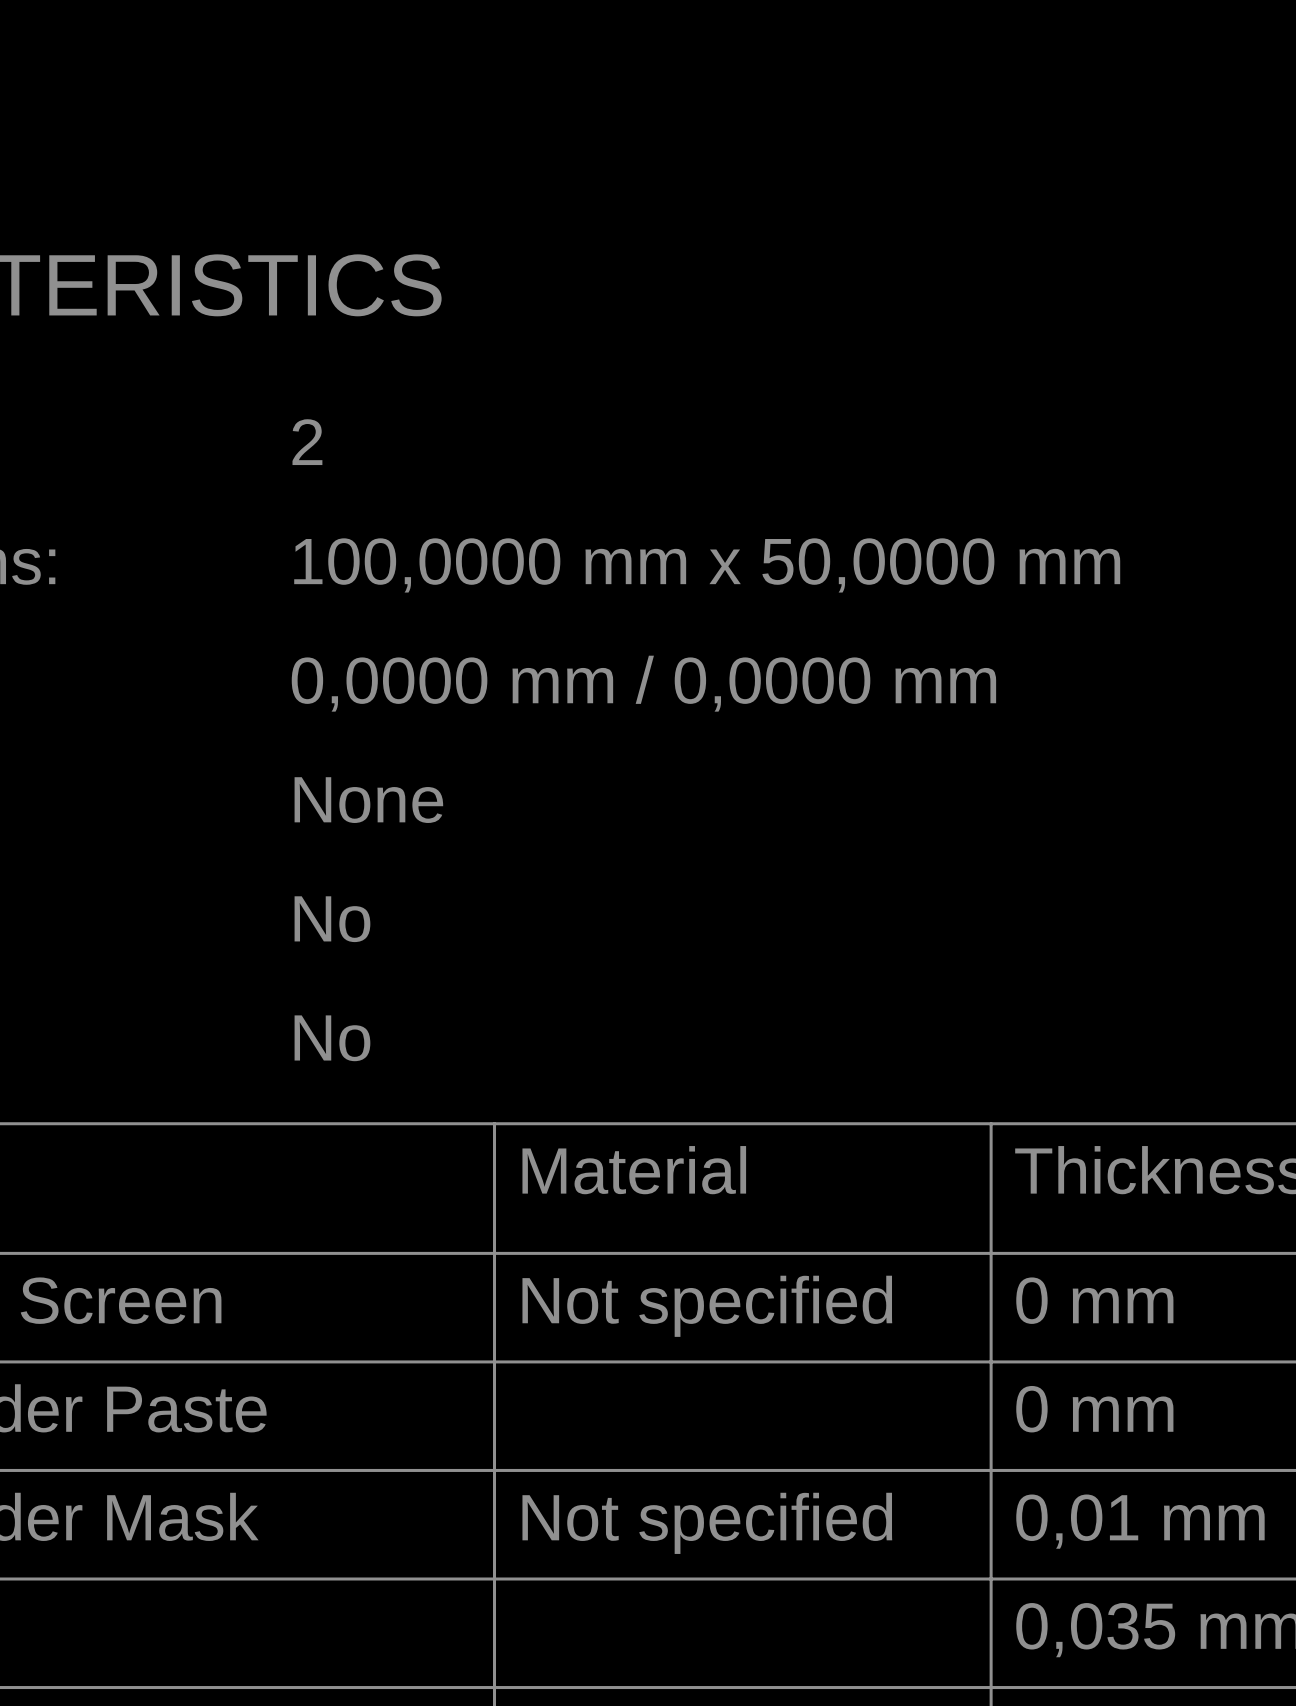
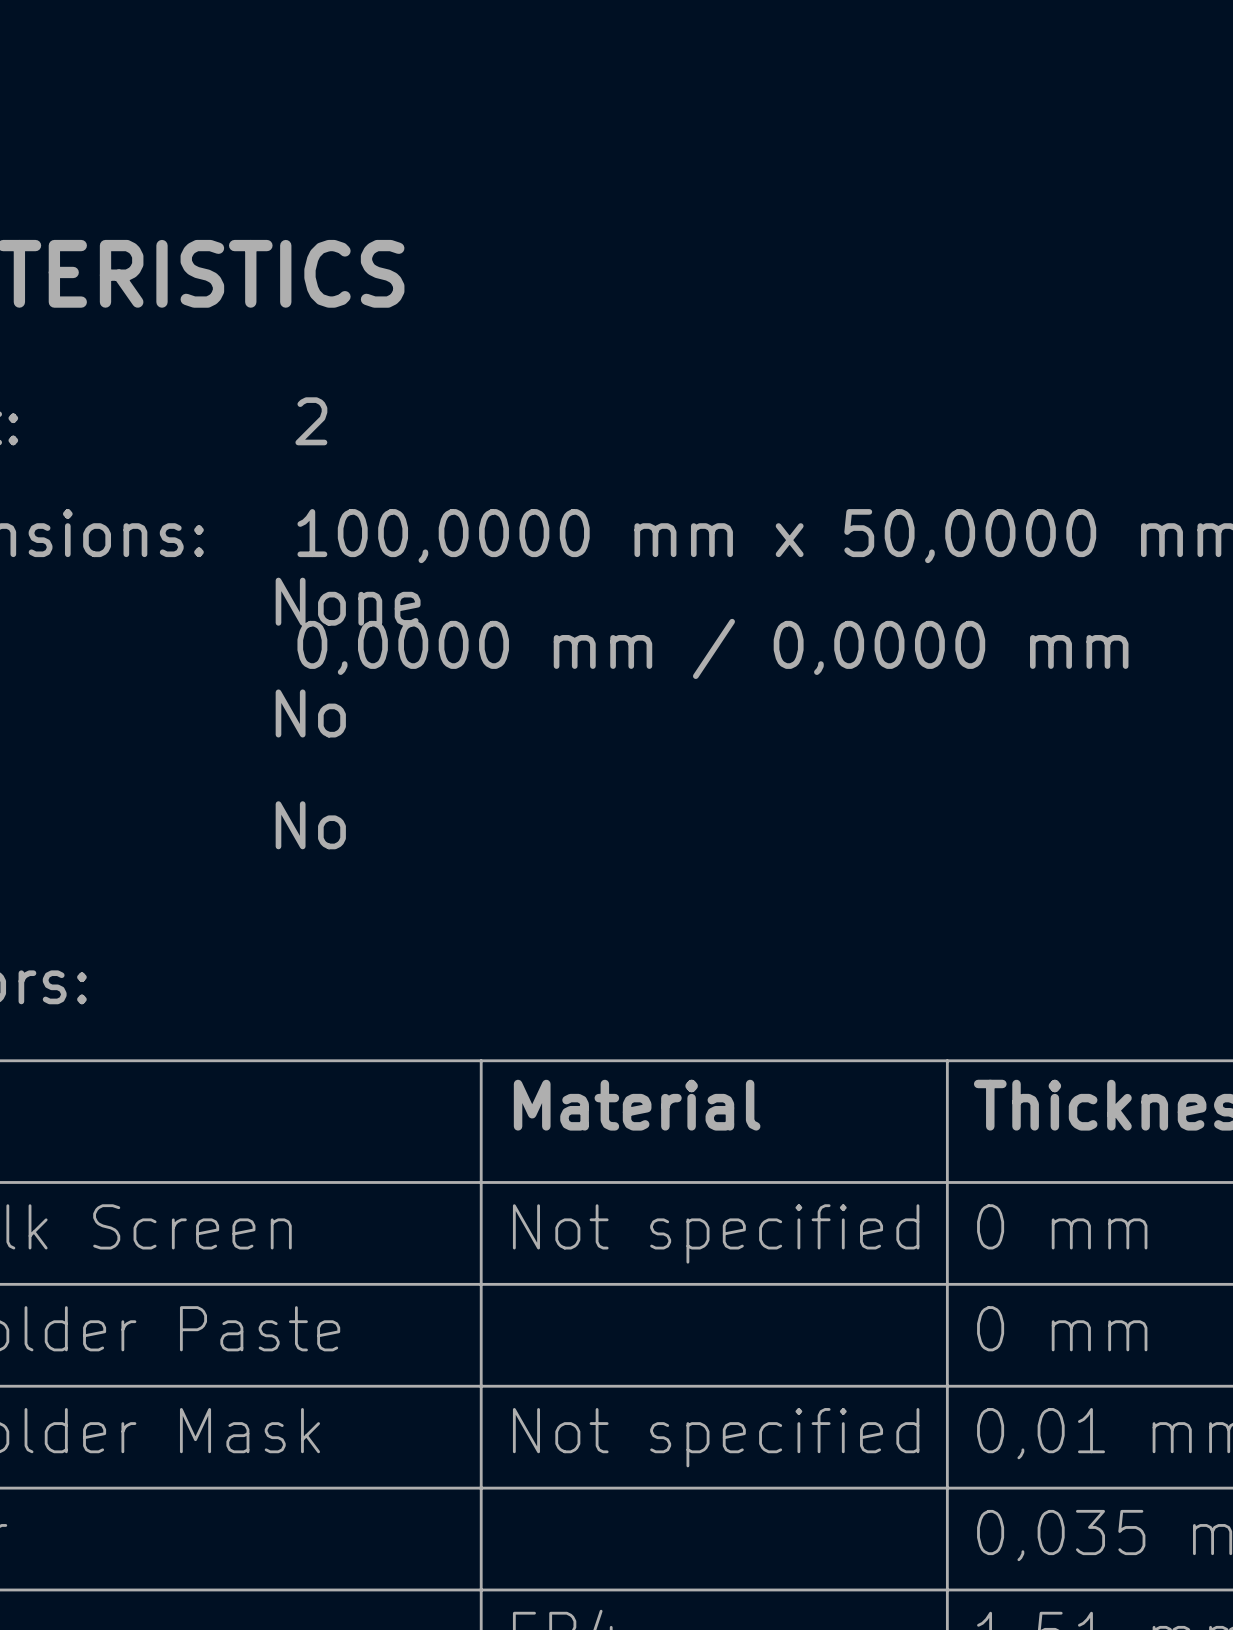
text: none -> No (310, 713)
text position: None (368, 800) -> None (348, 601)
text position: No (332, 919) -> No (310, 825)
text: No (332, 1038) -> none

